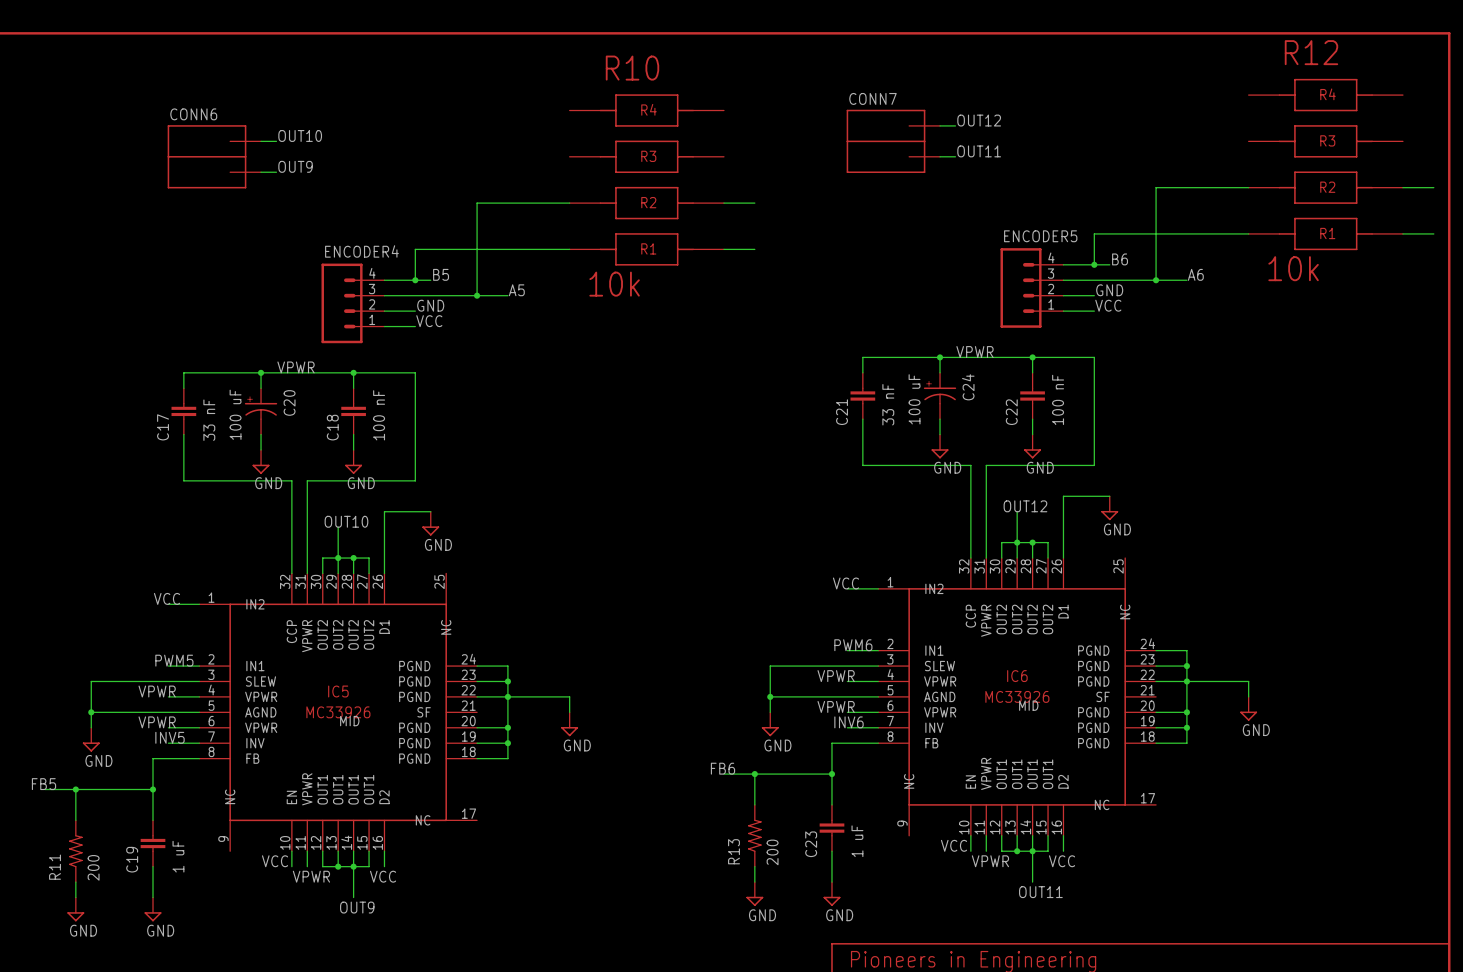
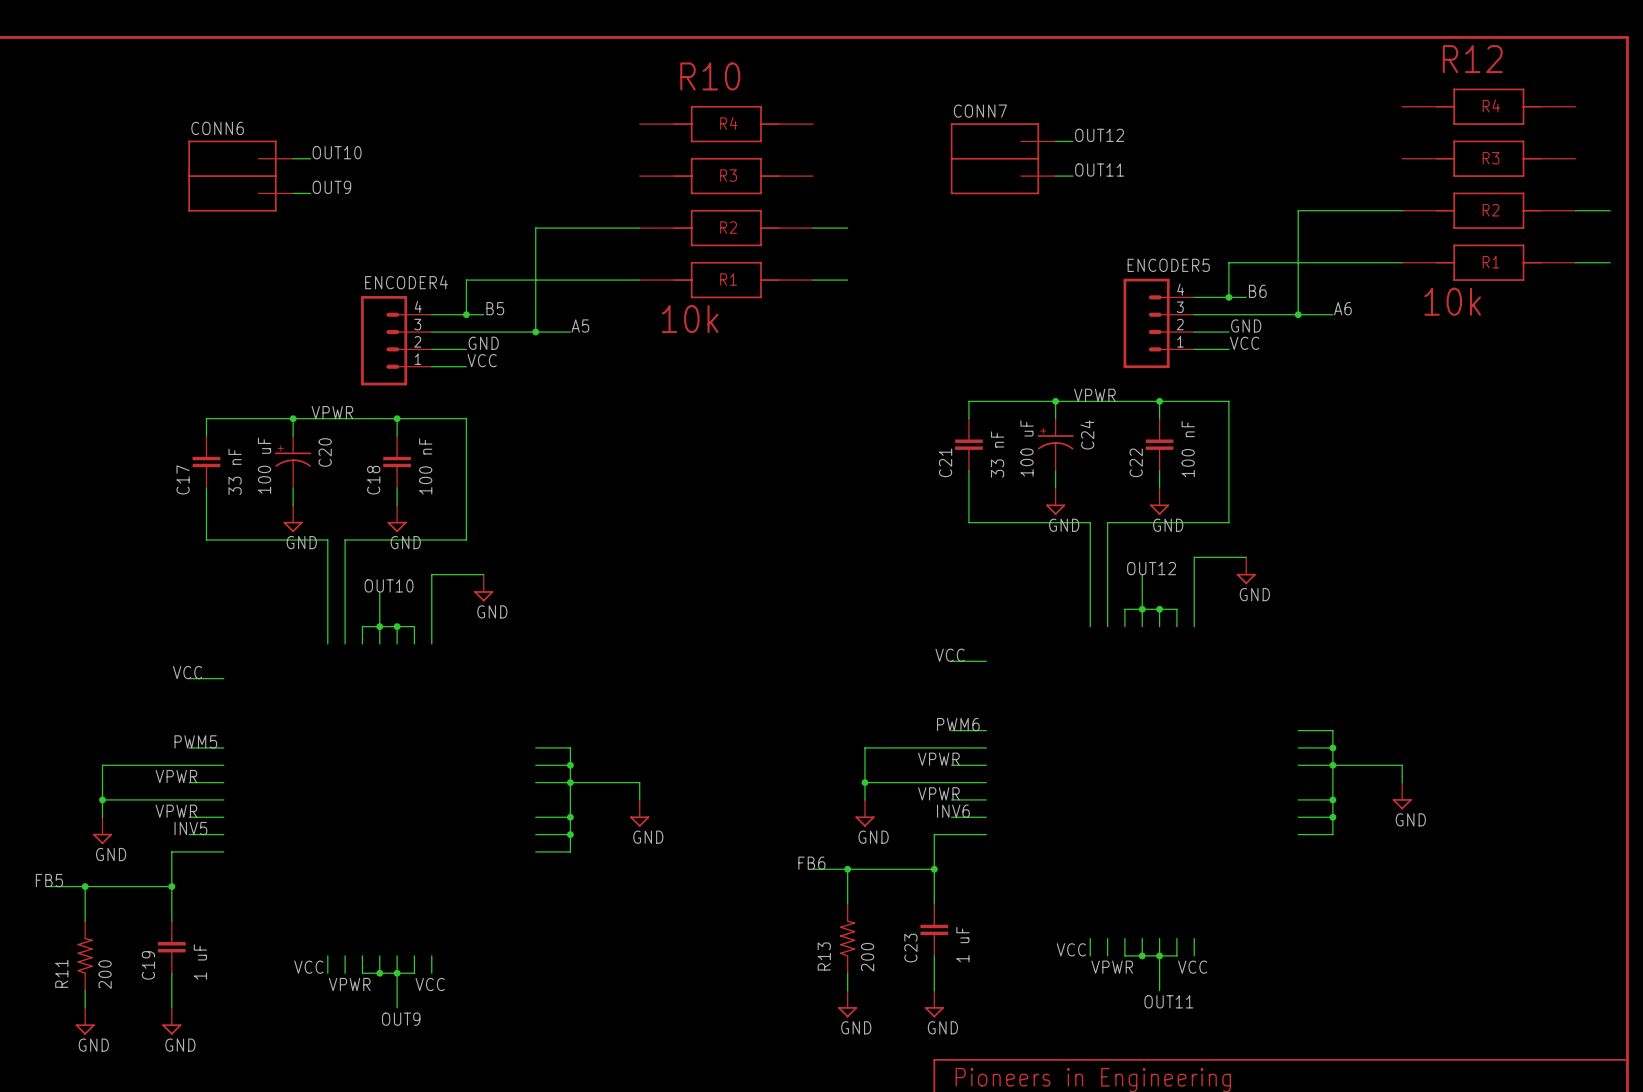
IC6: (1017, 696) -> none
IC5: (338, 712) -> none

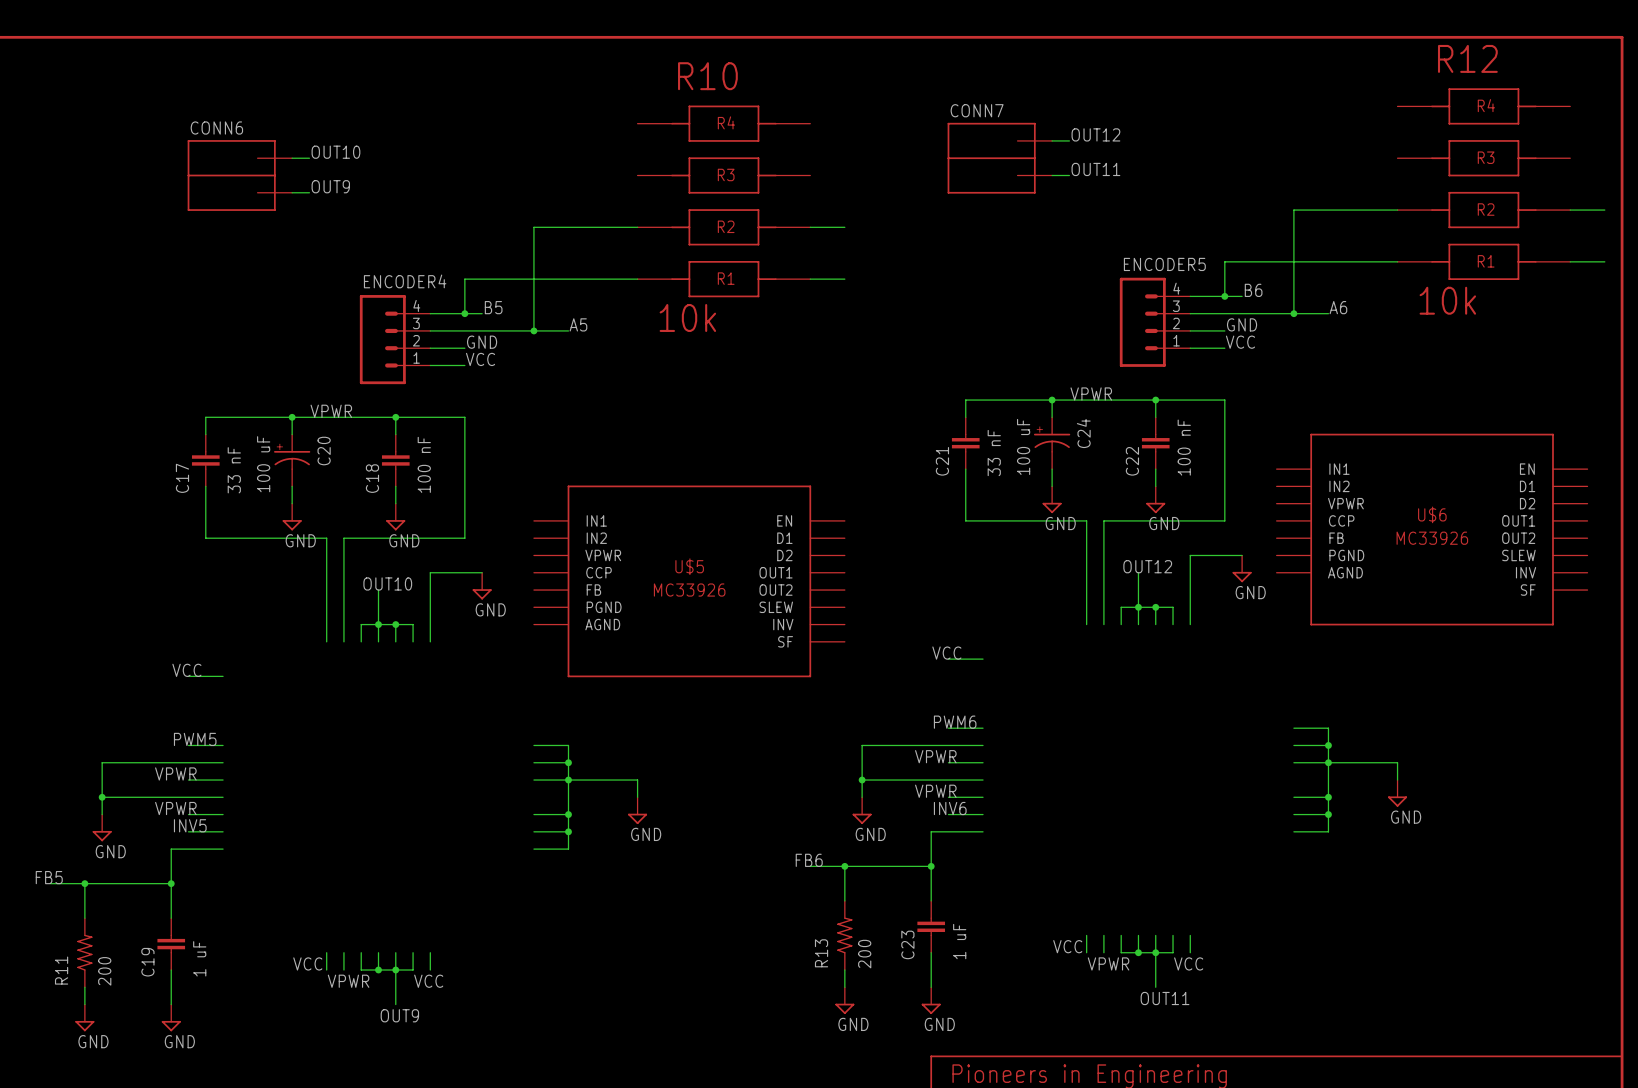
U$6: none -> (1432, 529)
U$5: none -> (689, 581)

